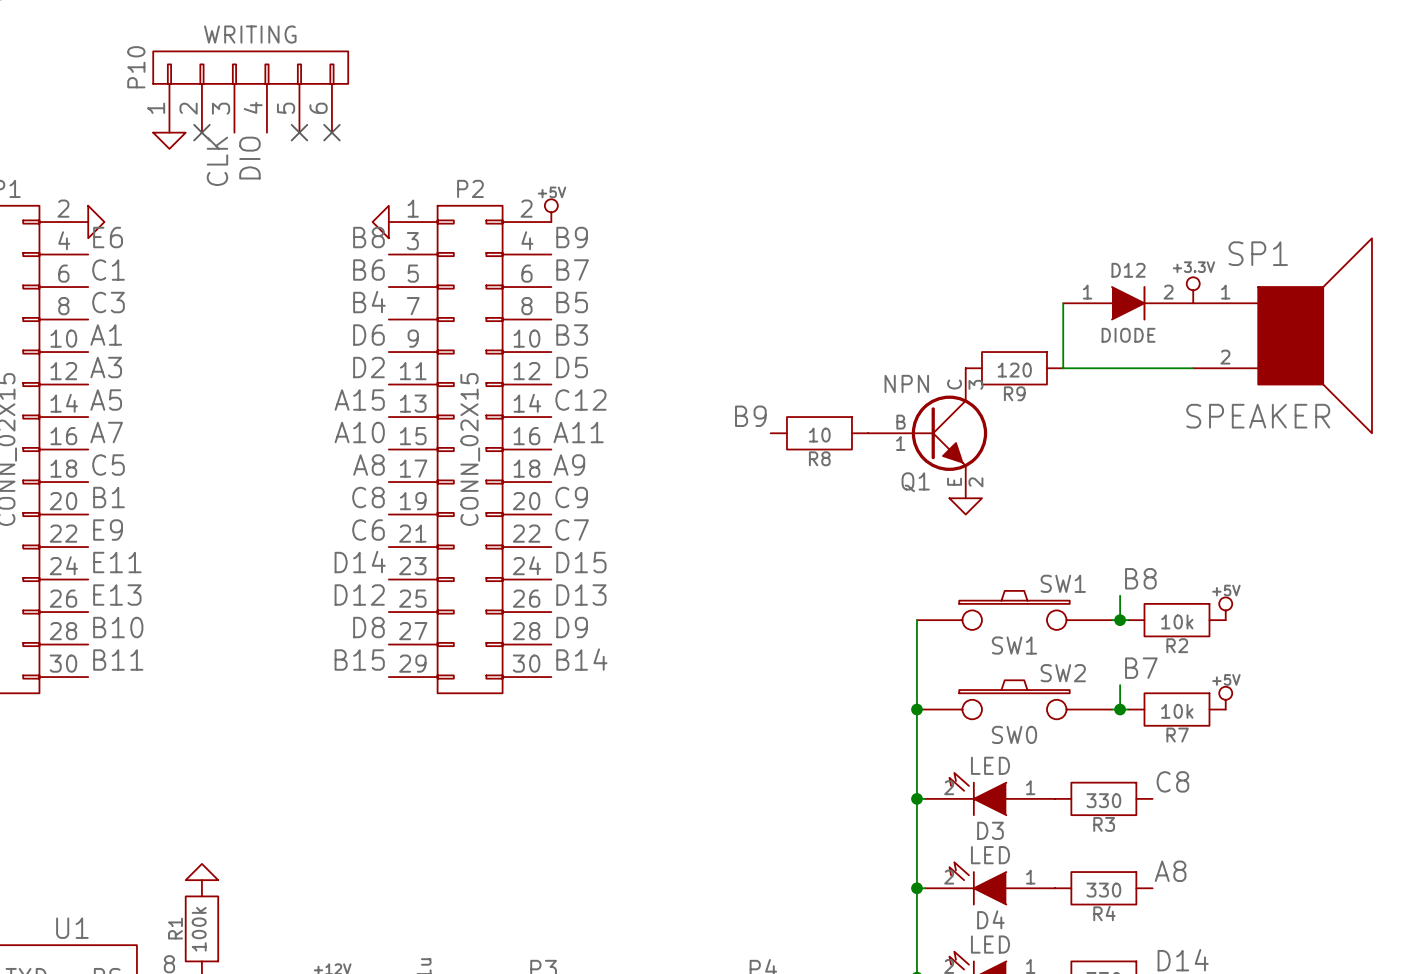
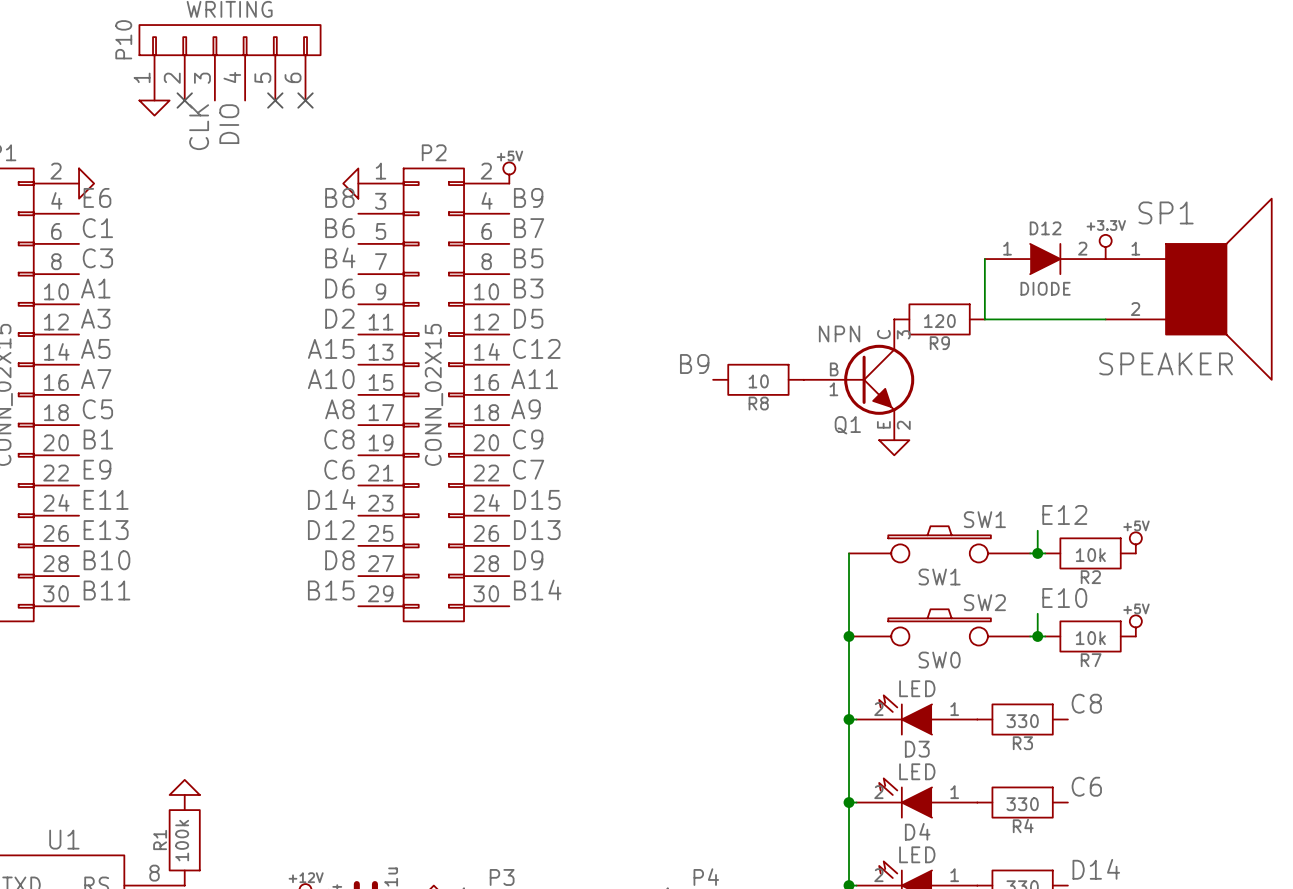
label: B8 (1140, 578) -> E12 (1064, 514)
label: B7 (1141, 668) -> E10 (1064, 598)
label: A8 (1170, 871) -> C6 (1086, 786)

